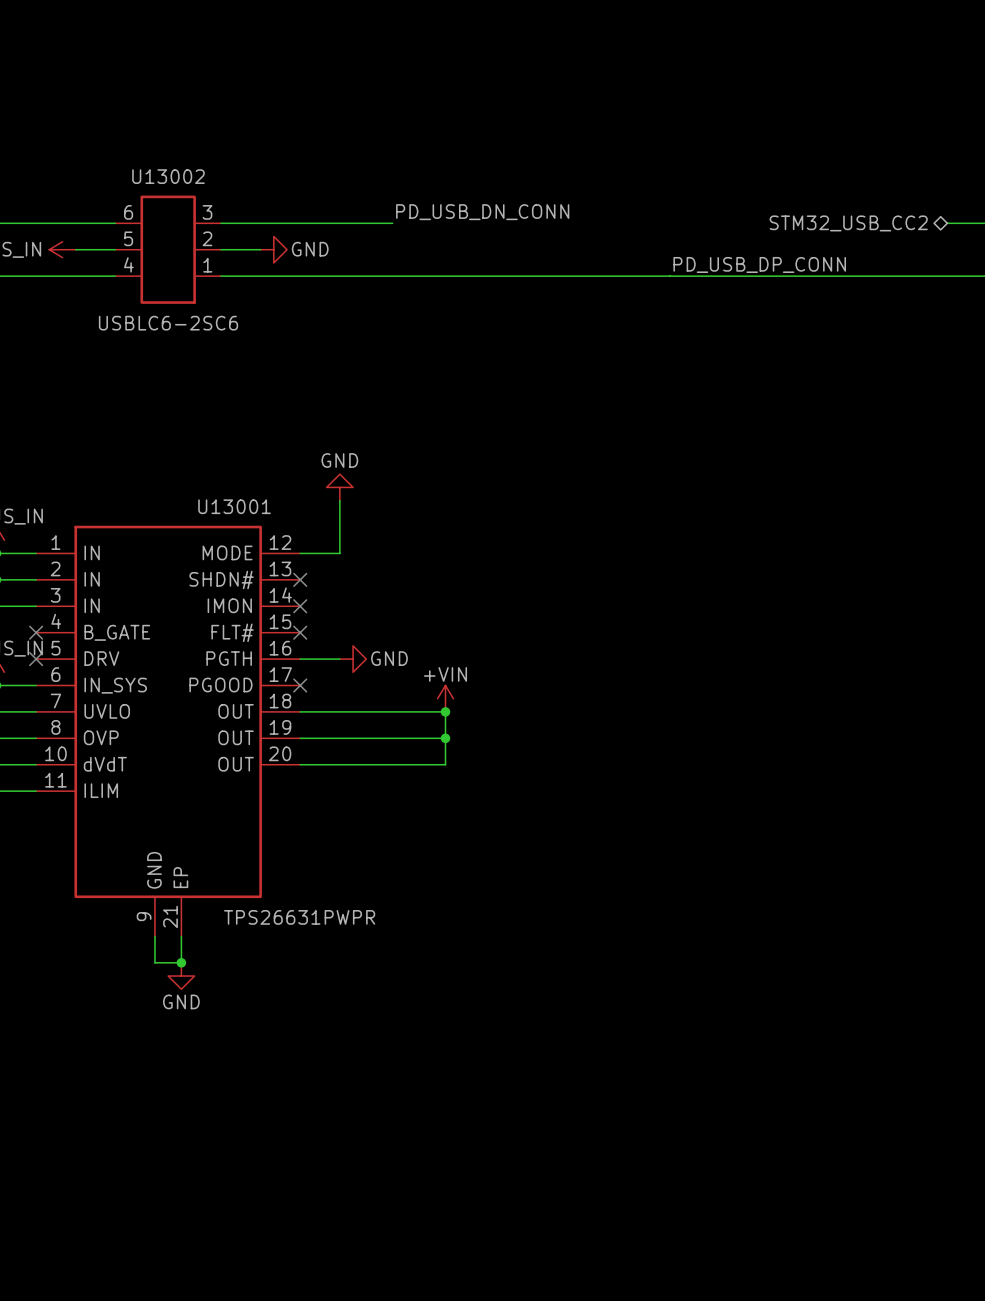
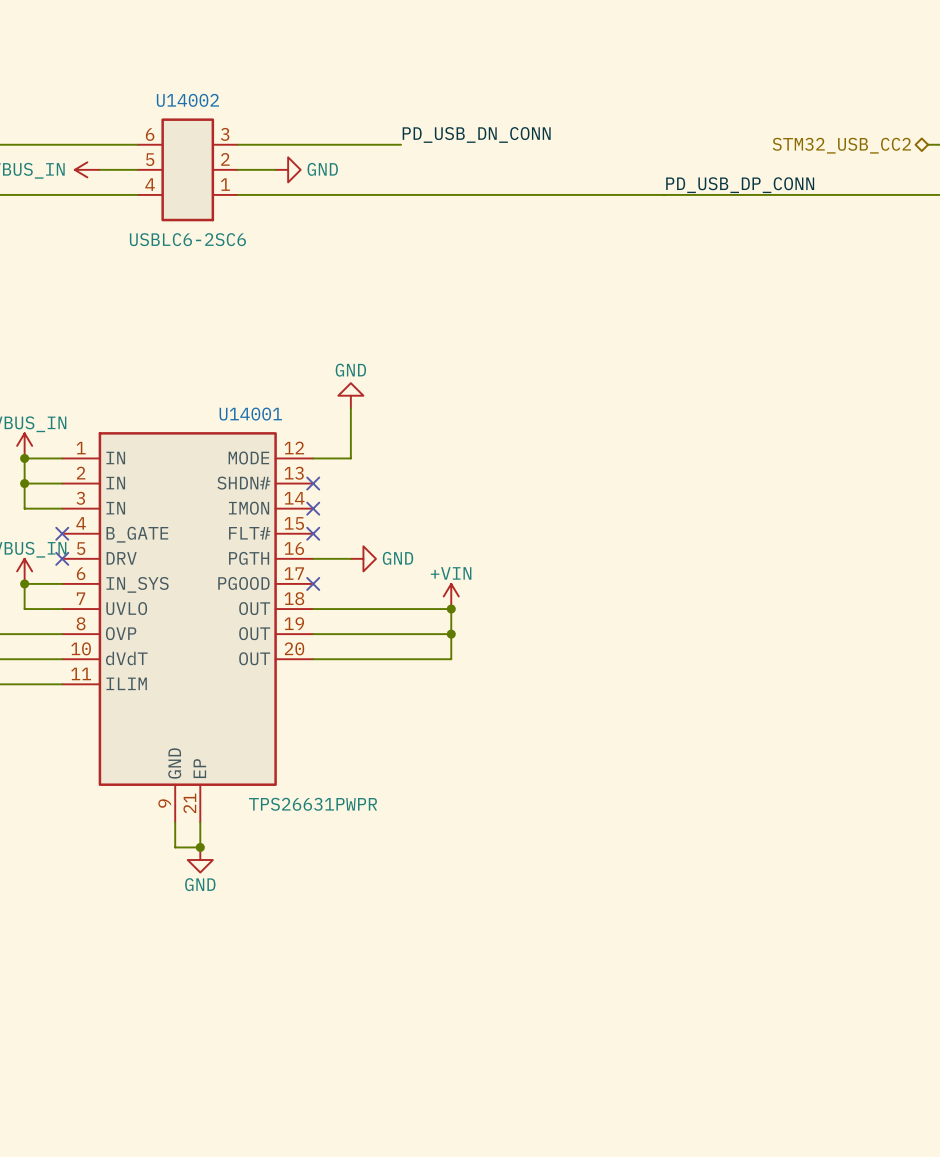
U13002 name: U13002 (168, 176) -> U14002 (187, 100)
U13001 name: U13001 (234, 506) -> U14001 (250, 414)

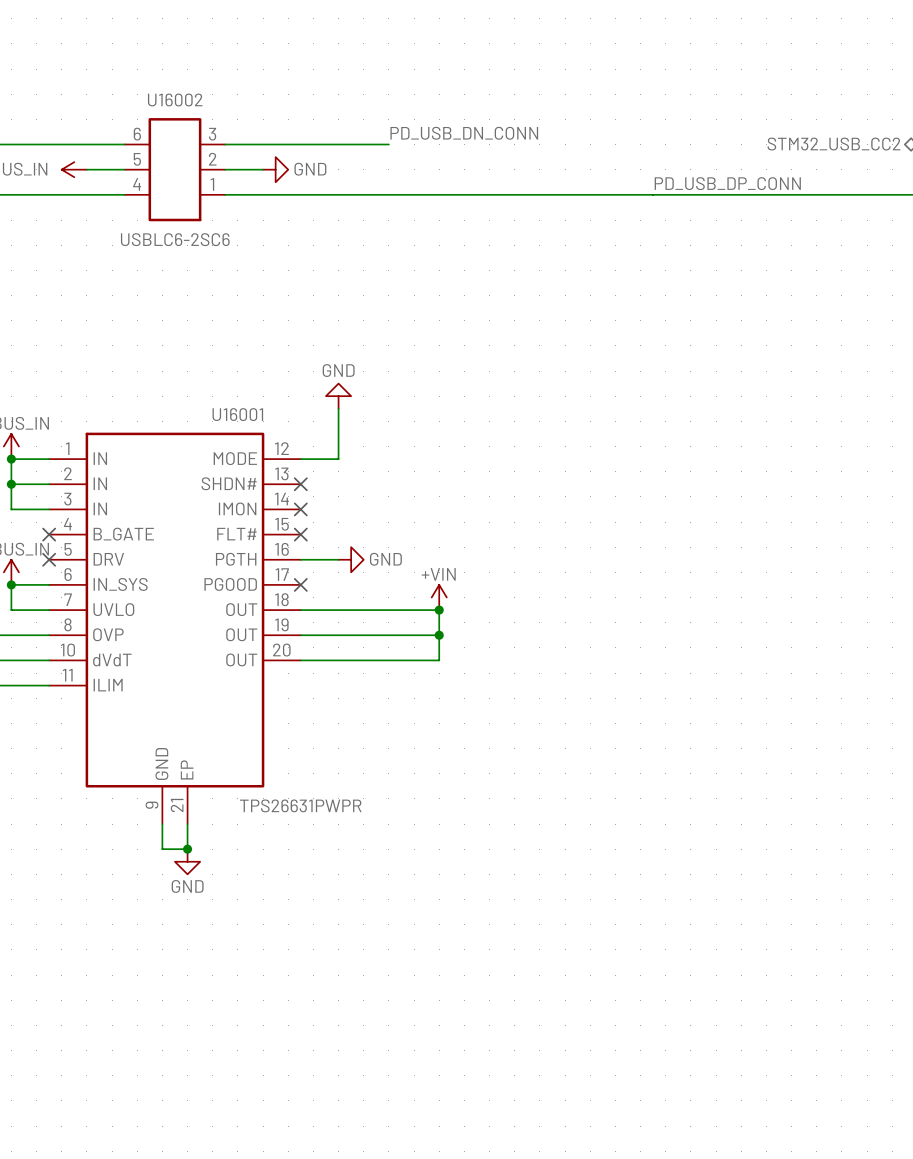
U14002 name: U14002 (187, 100) -> U16002 (175, 99)
U14001 name: U14001 (250, 414) -> U16001 (237, 414)

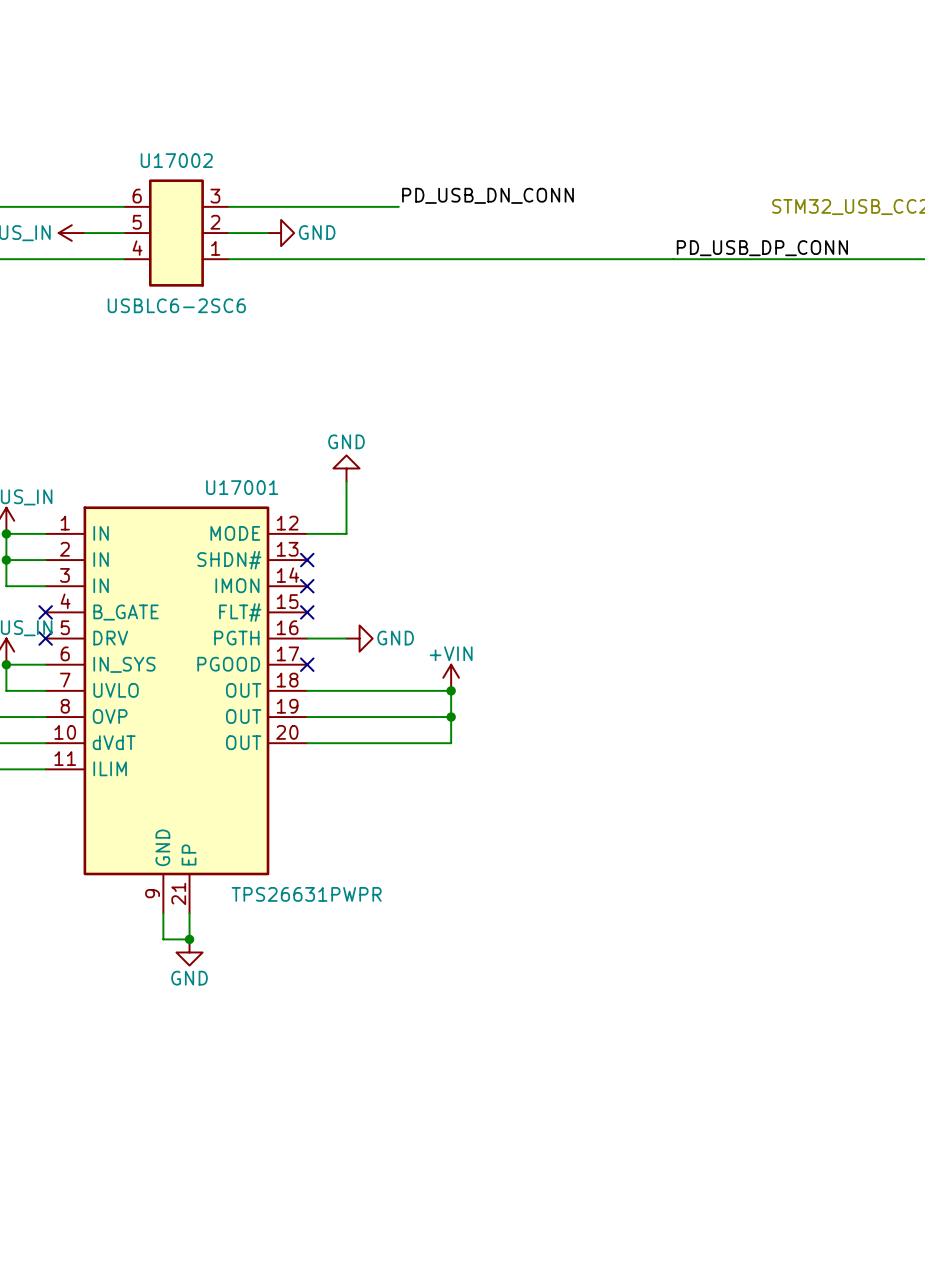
U16002 name: U16002 (175, 99) -> U17002 (176, 160)
U16001 name: U16001 (237, 414) -> U17001 (242, 487)

